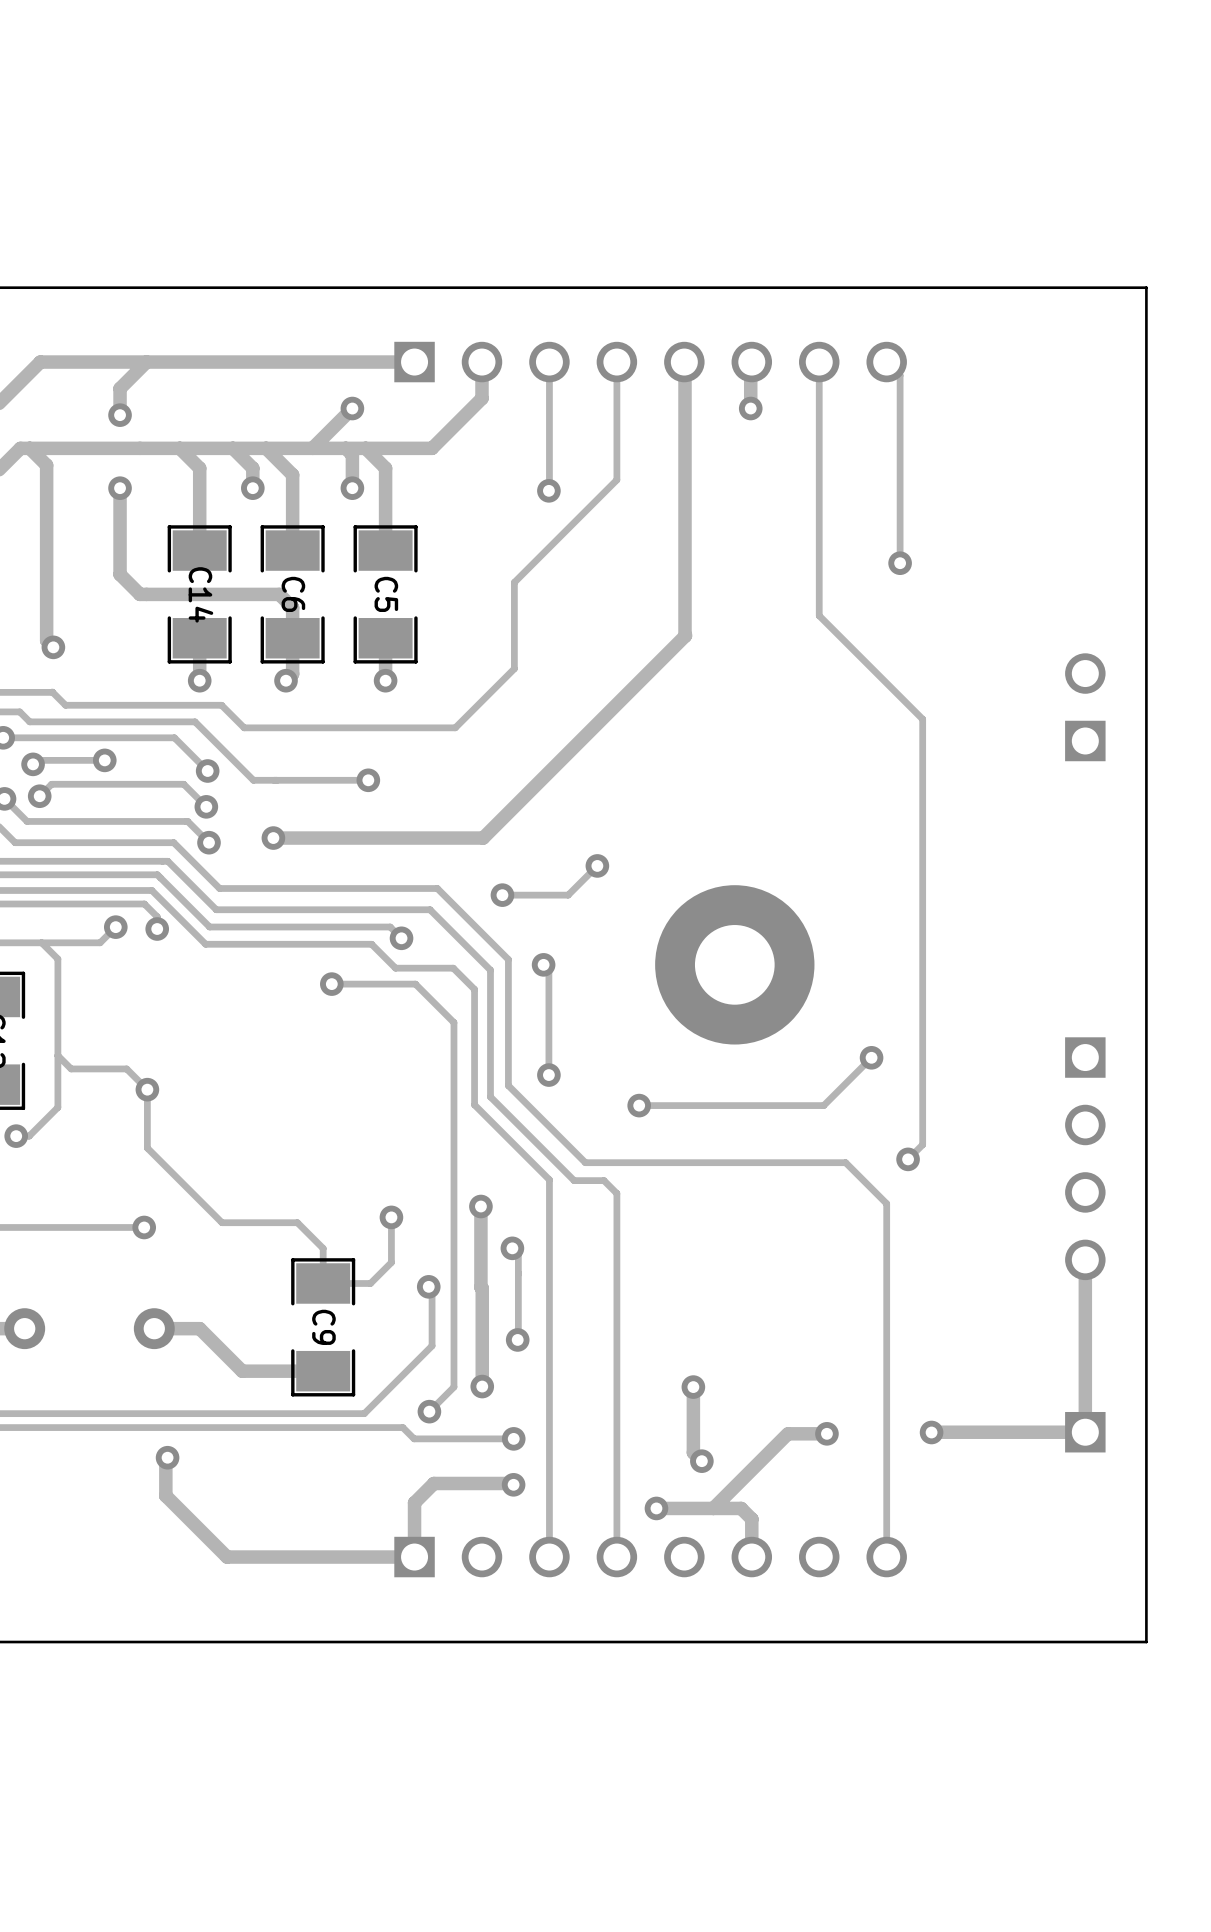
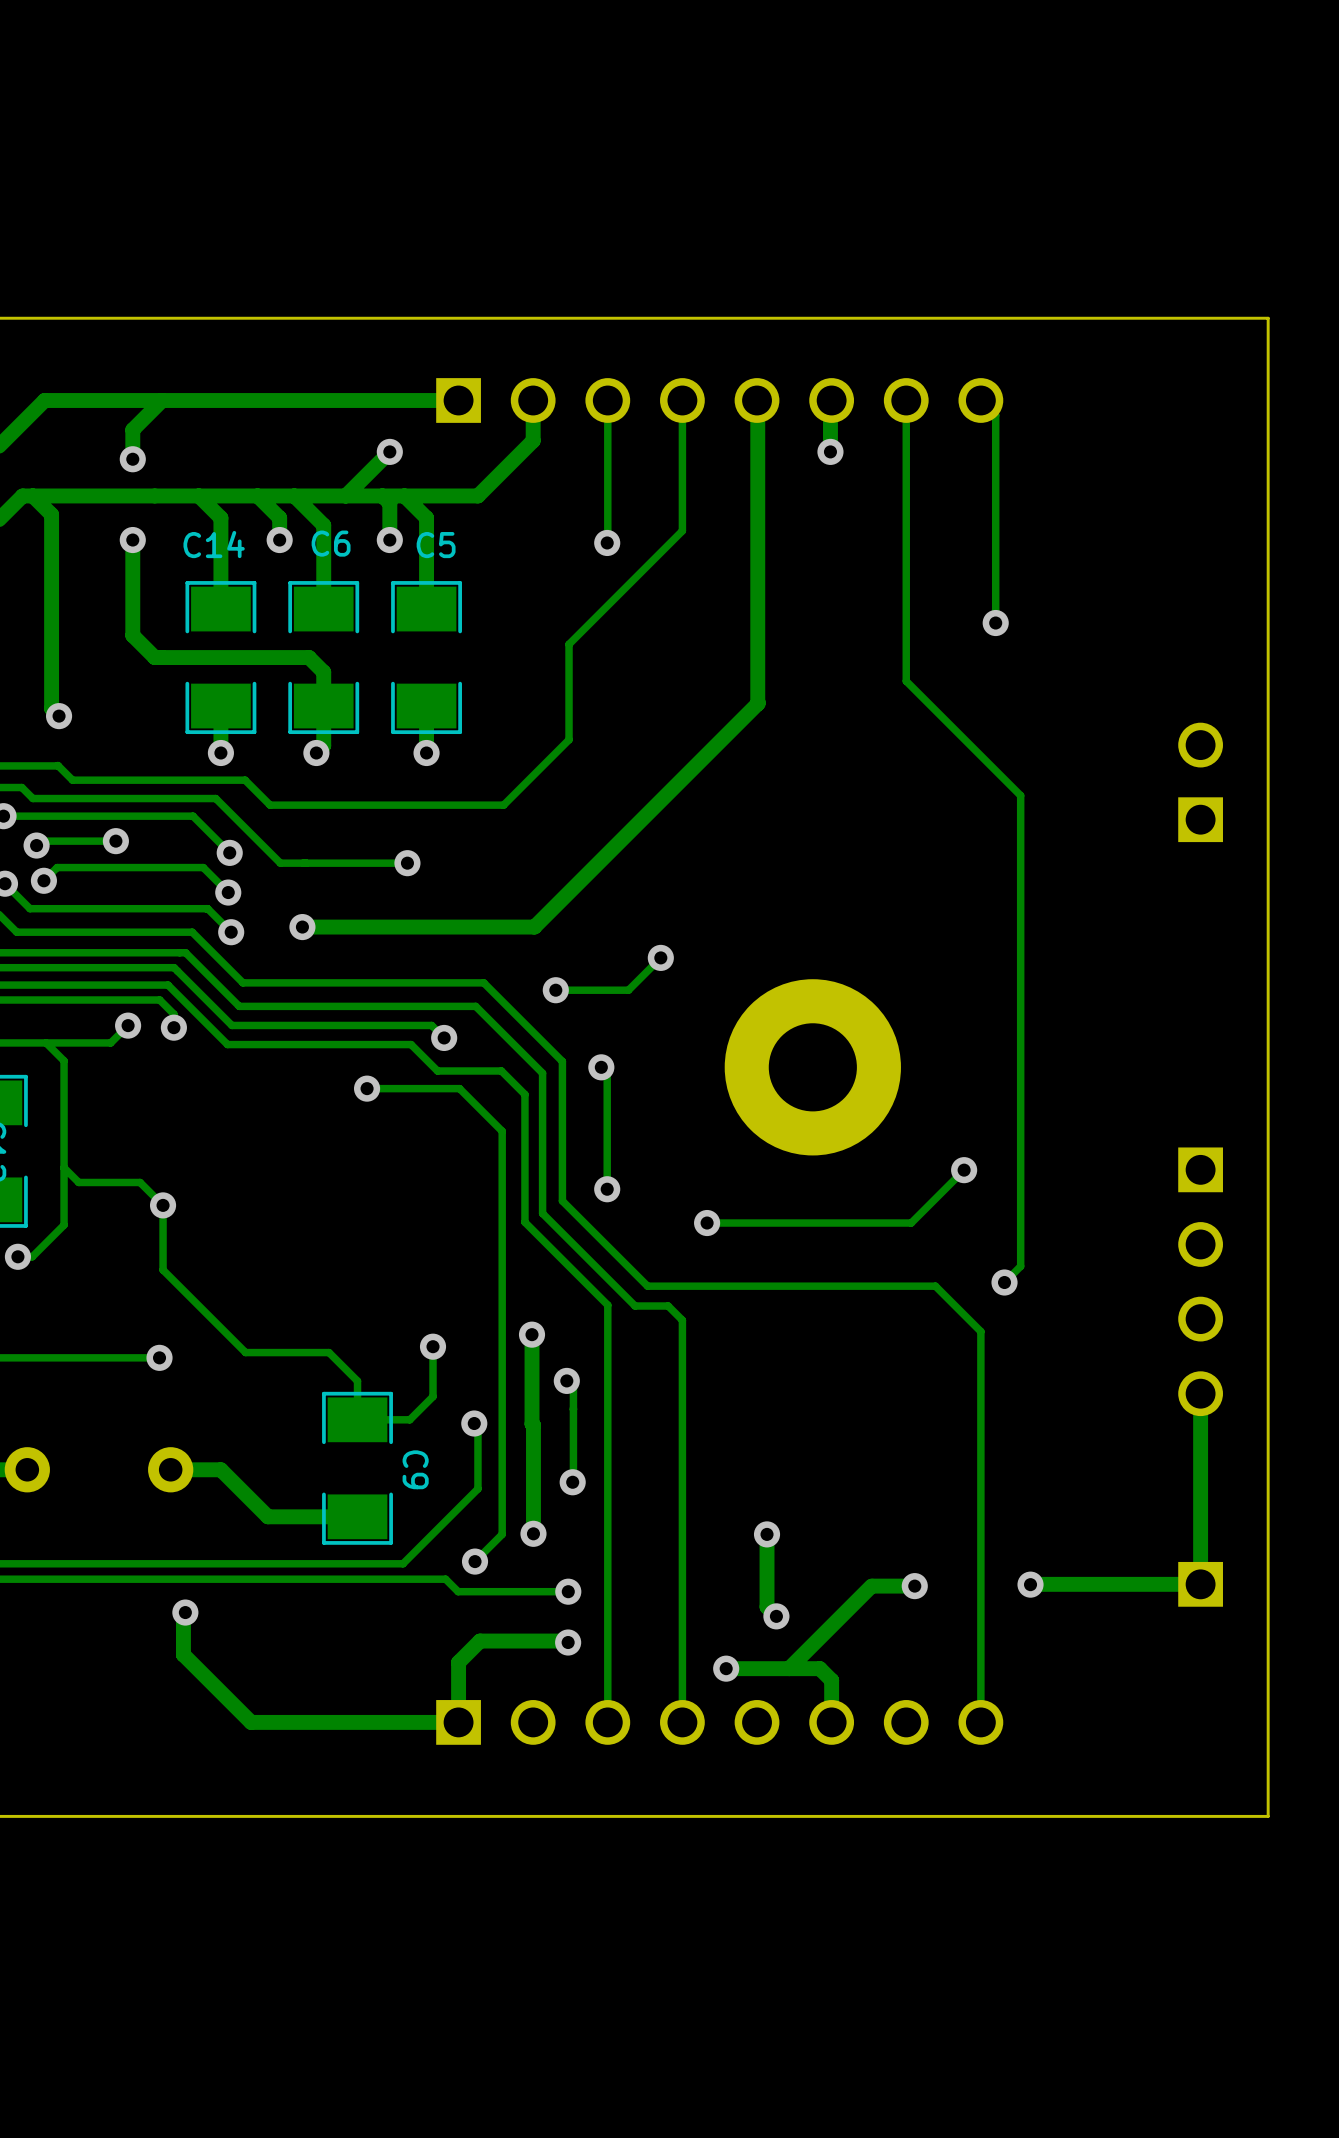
C14 name rotation: 0° (200, 594) -> 90° counterclockwise (214, 544)
C14 name position: C14 (200, 594) -> C14 (214, 544)
C6 name rotation: 0° (293, 594) -> 90° counterclockwise (331, 543)
C6 name position: C6 (293, 594) -> C6 (331, 543)
C5 name rotation: 0° (386, 594) -> 90° counterclockwise (436, 545)
C5 name position: C5 (386, 594) -> C5 (436, 545)
C9 name position: C9 (323, 1327) -> C9 (415, 1469)

